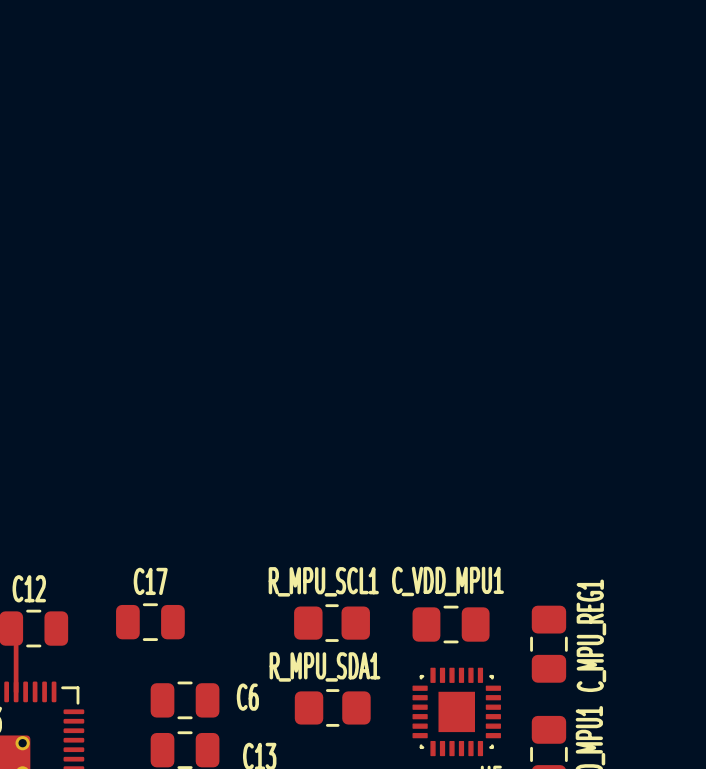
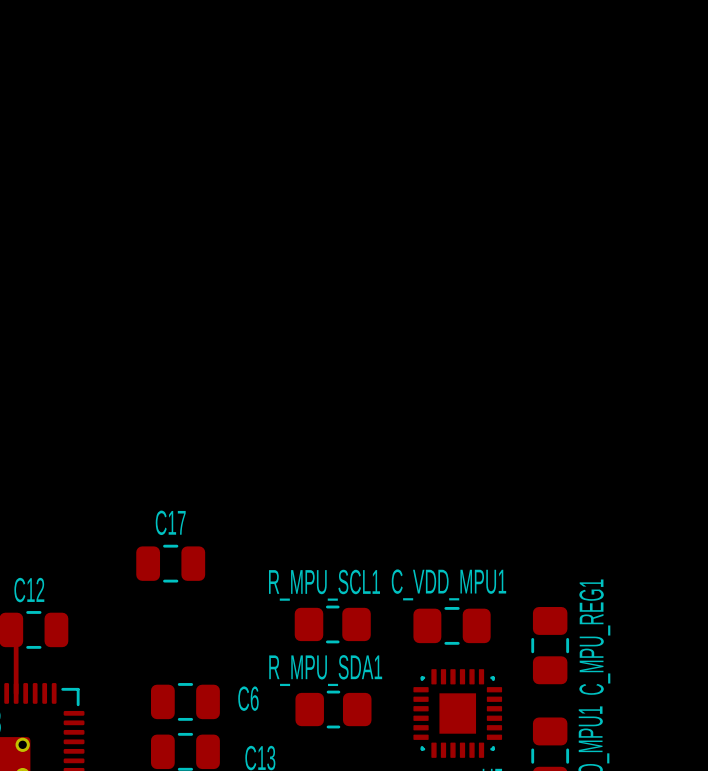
C17 position: (150, 622) -> (170, 563)

